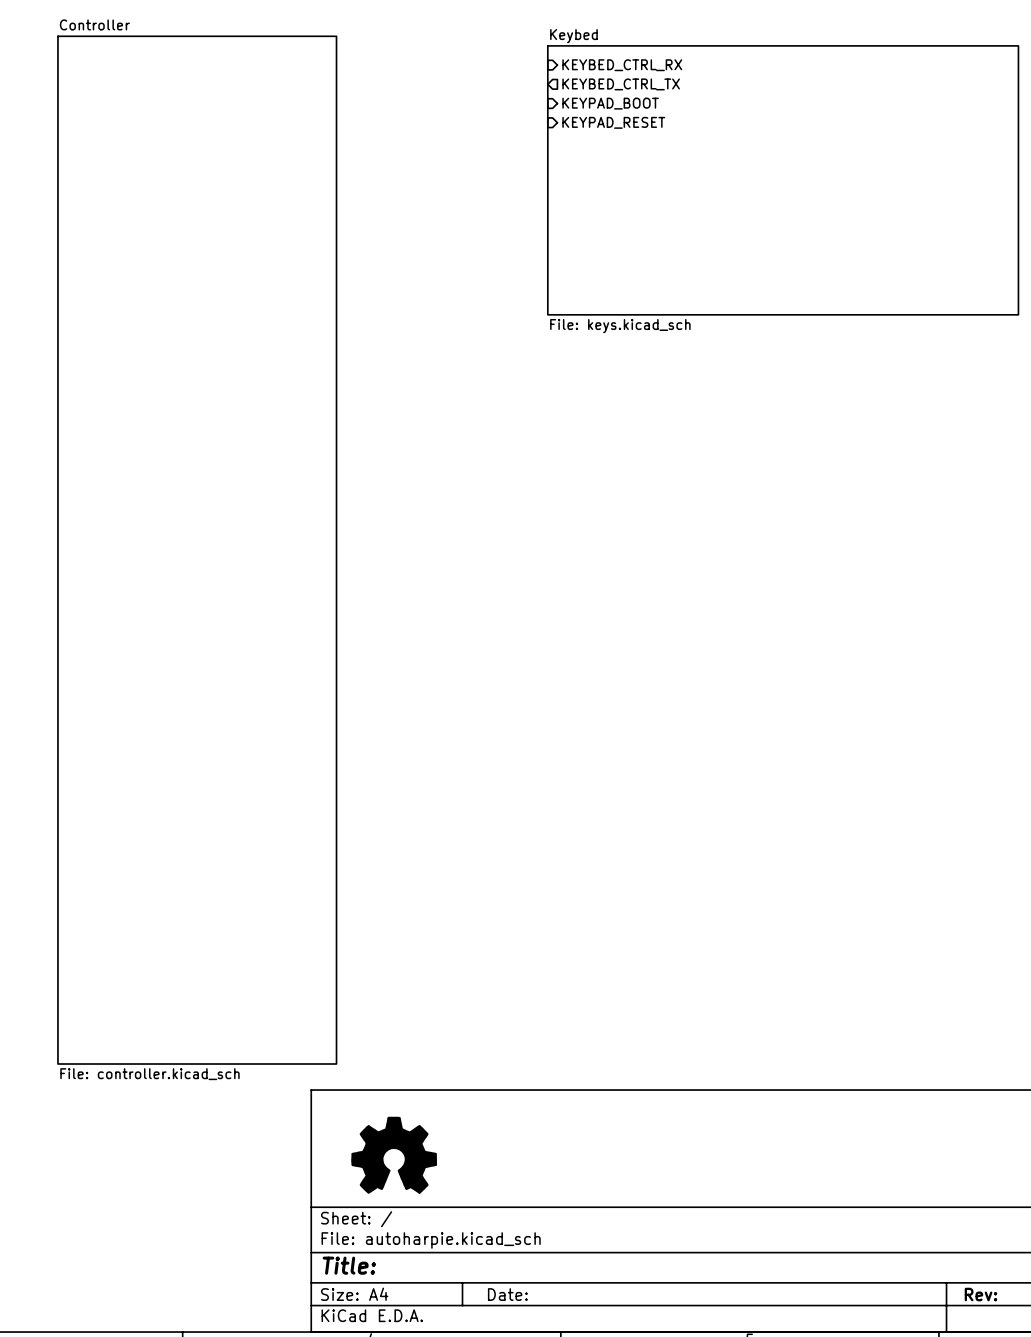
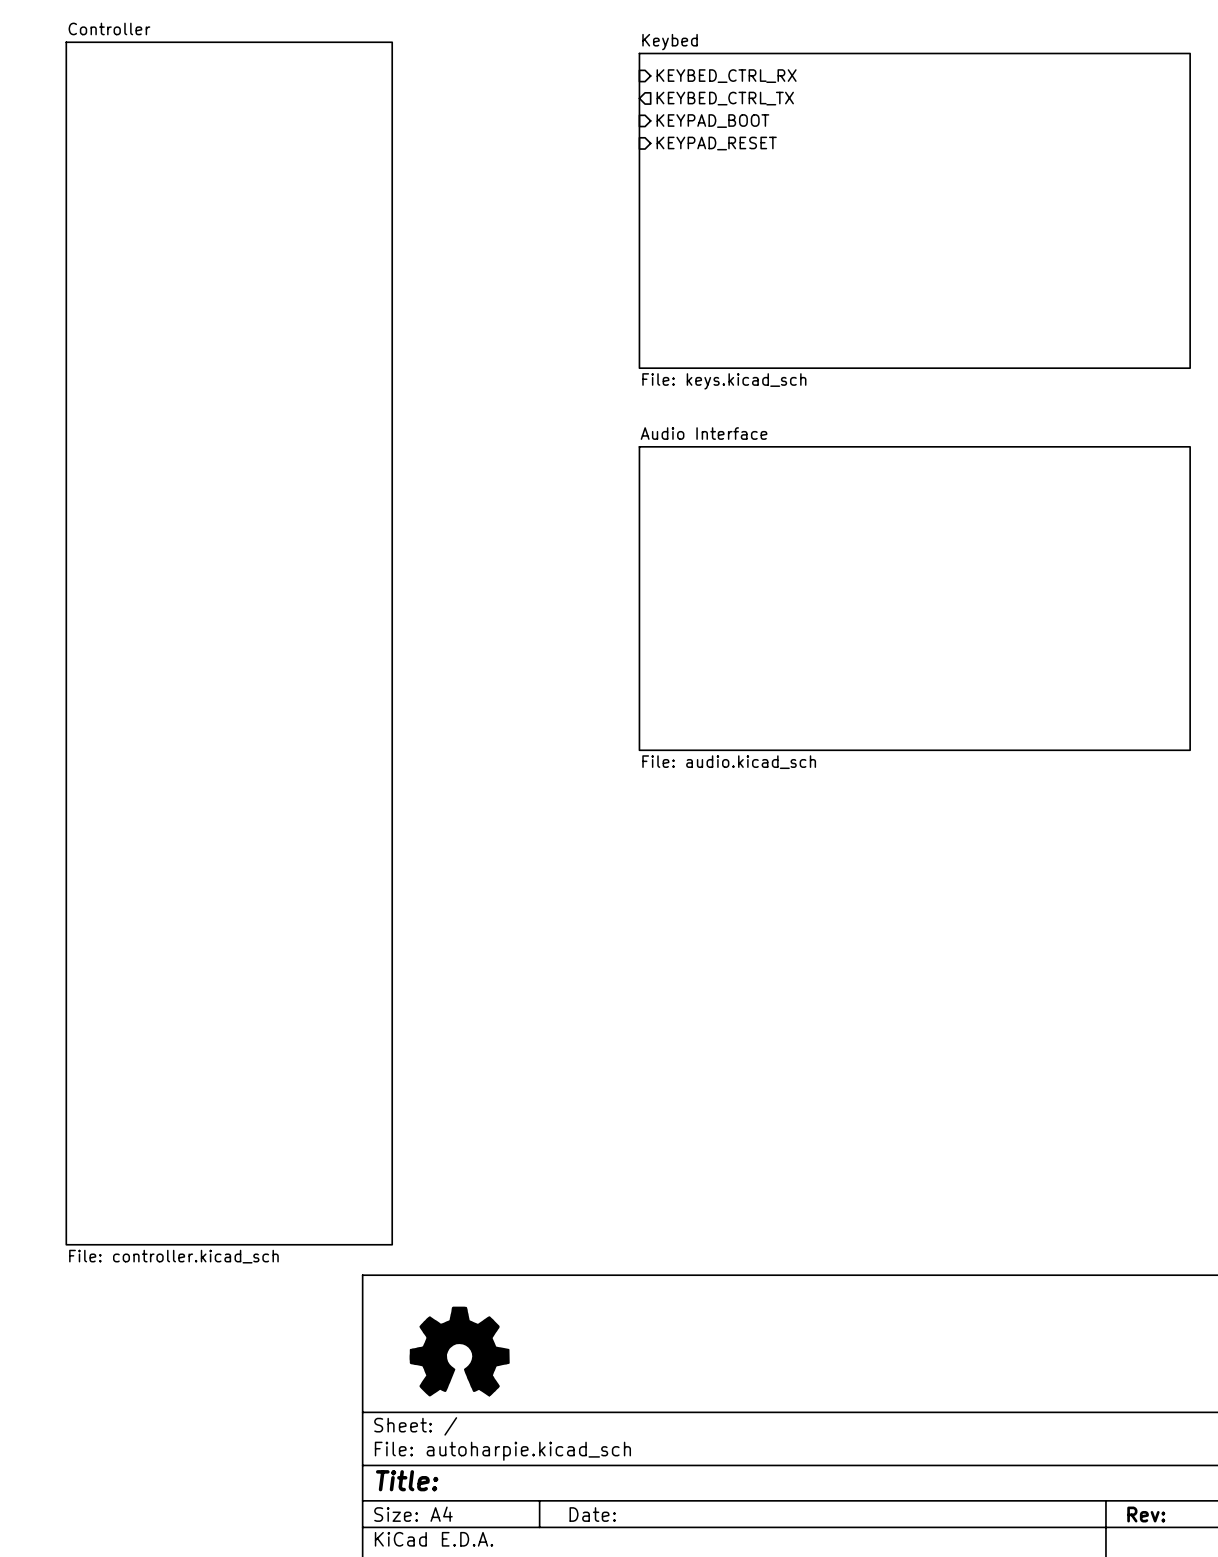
sheet Audio Interface: none -> File: audio.kicad_sch (914, 598)

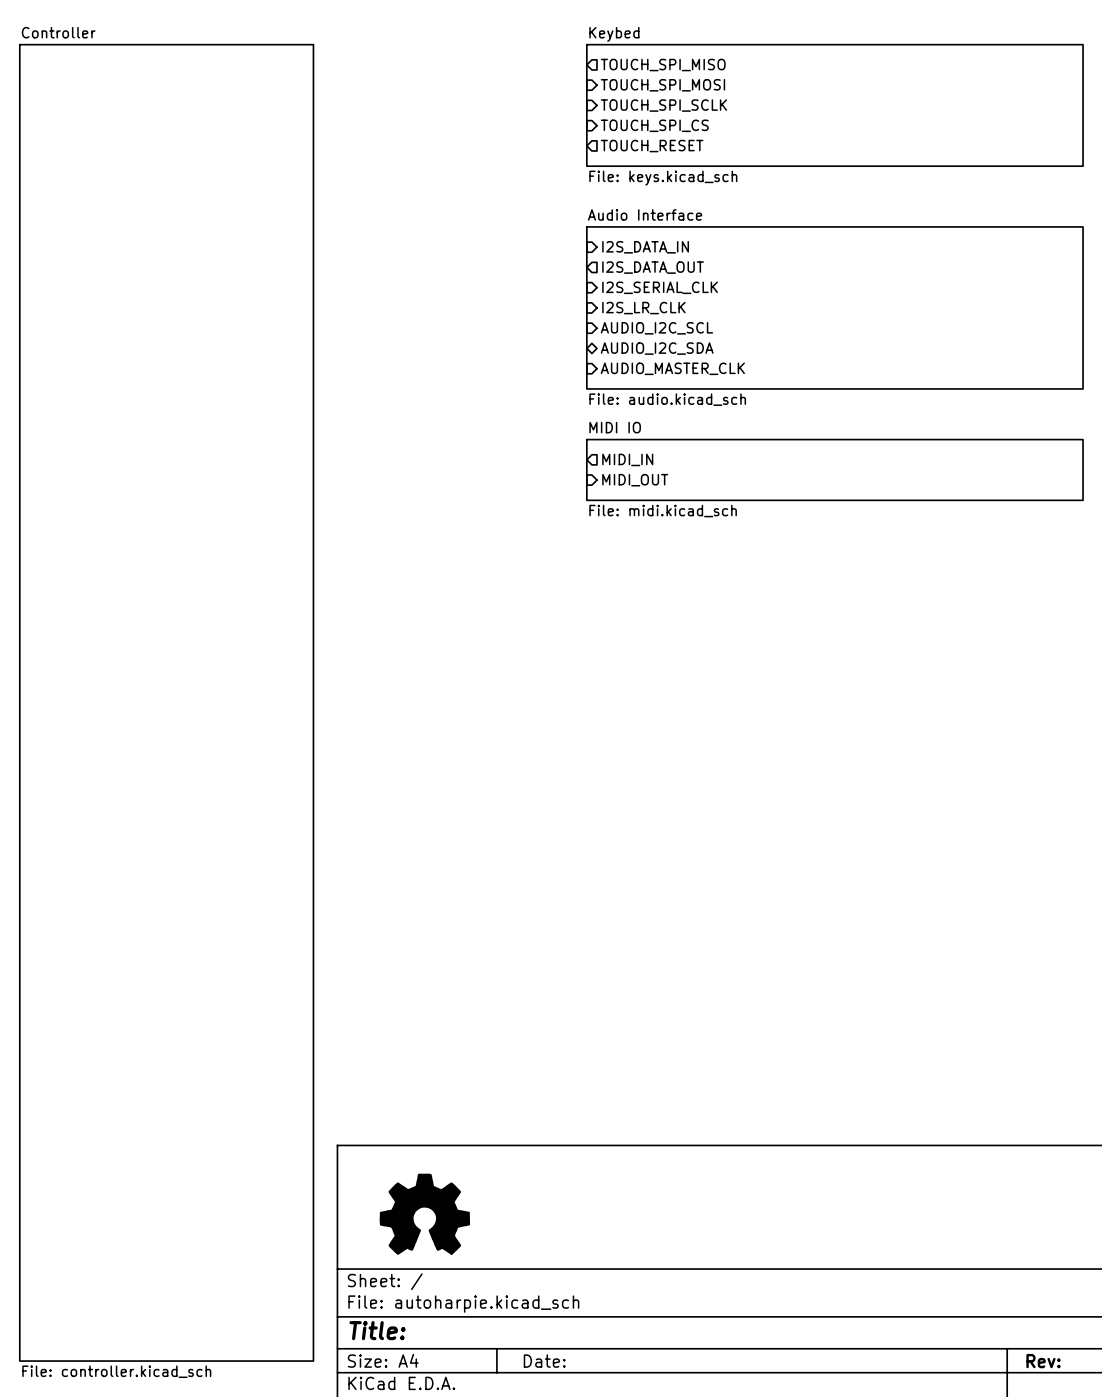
sheet pin shape: input (726, 76) -> output (663, 65)
sheet pin: KEYBED_CTRL_RX (726, 76) -> TOUCH_SPI_MISO (663, 65)
sheet pin shape: output (725, 98) -> input (662, 85)
sheet pin: KEYBED_CTRL_TX (725, 98) -> TOUCH_SPI_MOSI (662, 85)
sheet Keybed: none -> File: keys.kicad_sch (834, 105)
sheet pin: KEYPAD_BOOT (712, 121) -> TOUCH_SPI_SCLK (663, 105)
sheet pin: KEYPAD_RESET (716, 143) -> TOUCH_SPI_CS (654, 125)
sheet pin: none -> TOUCH_RESET (652, 146)
sheet Keybed: File: keys.kicad_sch (914, 210) -> none
sheet pin: none -> I2S_DATA_IN (645, 247)
sheet pin: none -> I2S_DATA_OUT (653, 267)
sheet pin: none -> I2S_SERIAL_CLK (660, 287)
sheet pin: none -> I2S_LR_CLK (643, 308)
sheet Audio Interface: none -> File: audio.kicad_sch (834, 307)
sheet pin: none -> AUDIO_I2C_SCL (656, 328)
sheet pin: none -> AUDIO_I2C_SDA (657, 348)
sheet pin: none -> AUDIO_MASTER_CLK (672, 368)
sheet pin: none -> MIDI_IN (627, 459)
sheet MIDI IO: none -> File: midi.kicad_sch (834, 469)
sheet pin: none -> MIDI_OUT (635, 480)
sheet Audio Interface: File: audio.kicad_sch (914, 598) -> none
sheet Controller: File: controller.kicad_sch (229, 643) -> none
sheet Controller: none -> File: controller.kicad_sch (166, 702)

